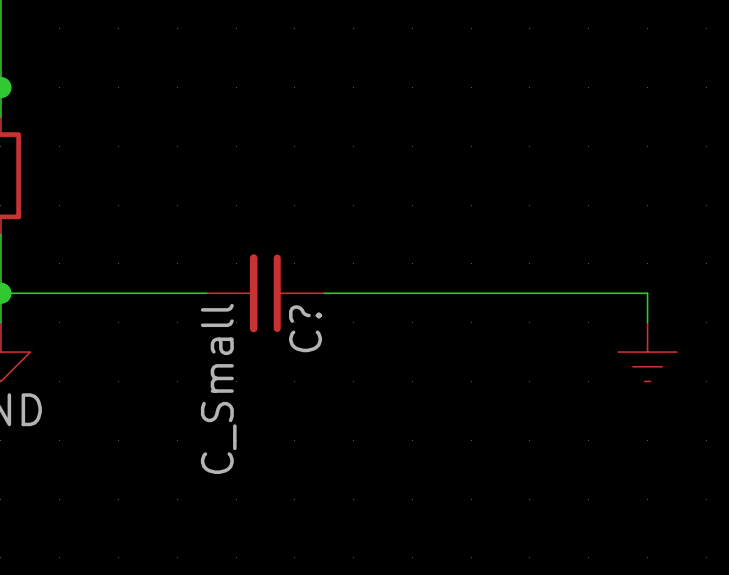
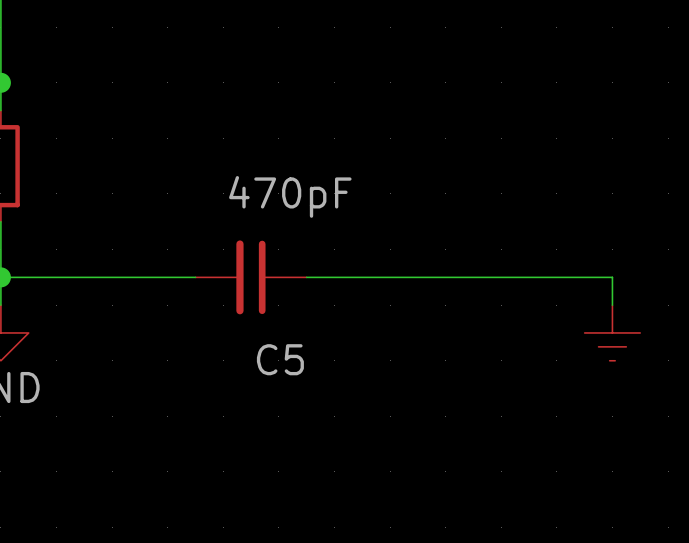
C? name: C? (305, 328) -> C5 (280, 359)
C? value: C_Small (218, 388) -> 470pF (290, 196)

